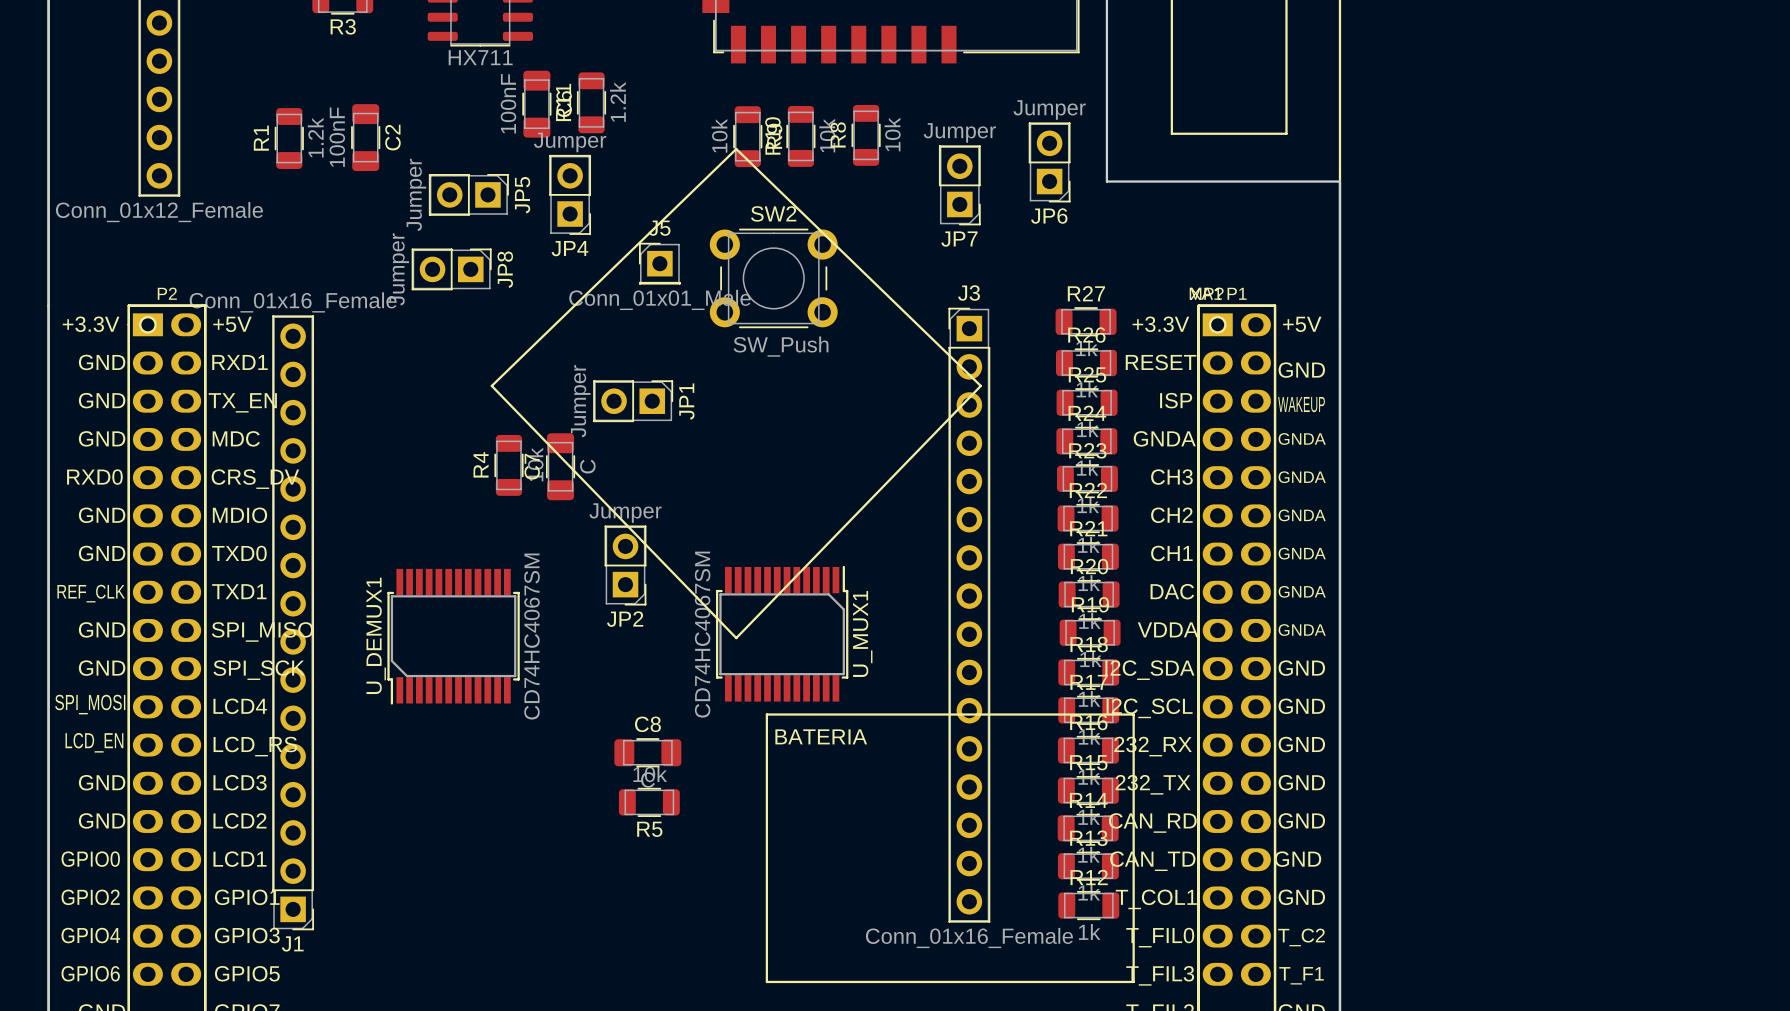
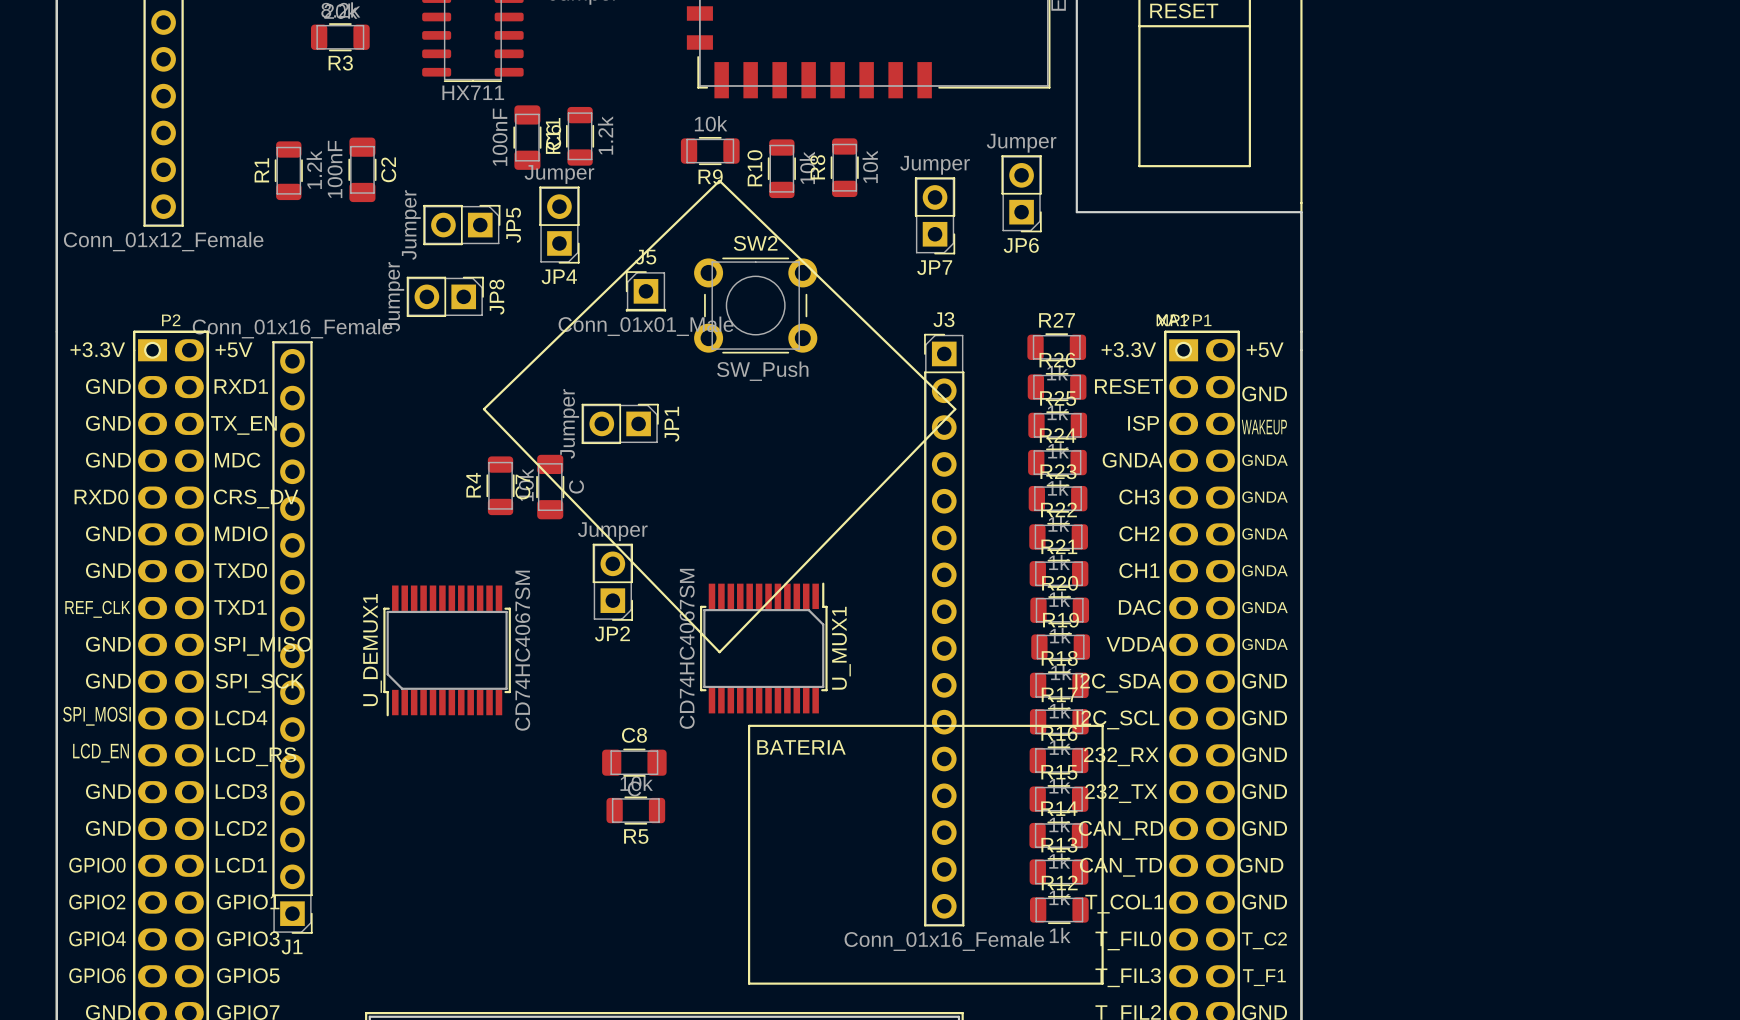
R9 rotation: 0° (747, 136) -> 90° clockwise (710, 151)

